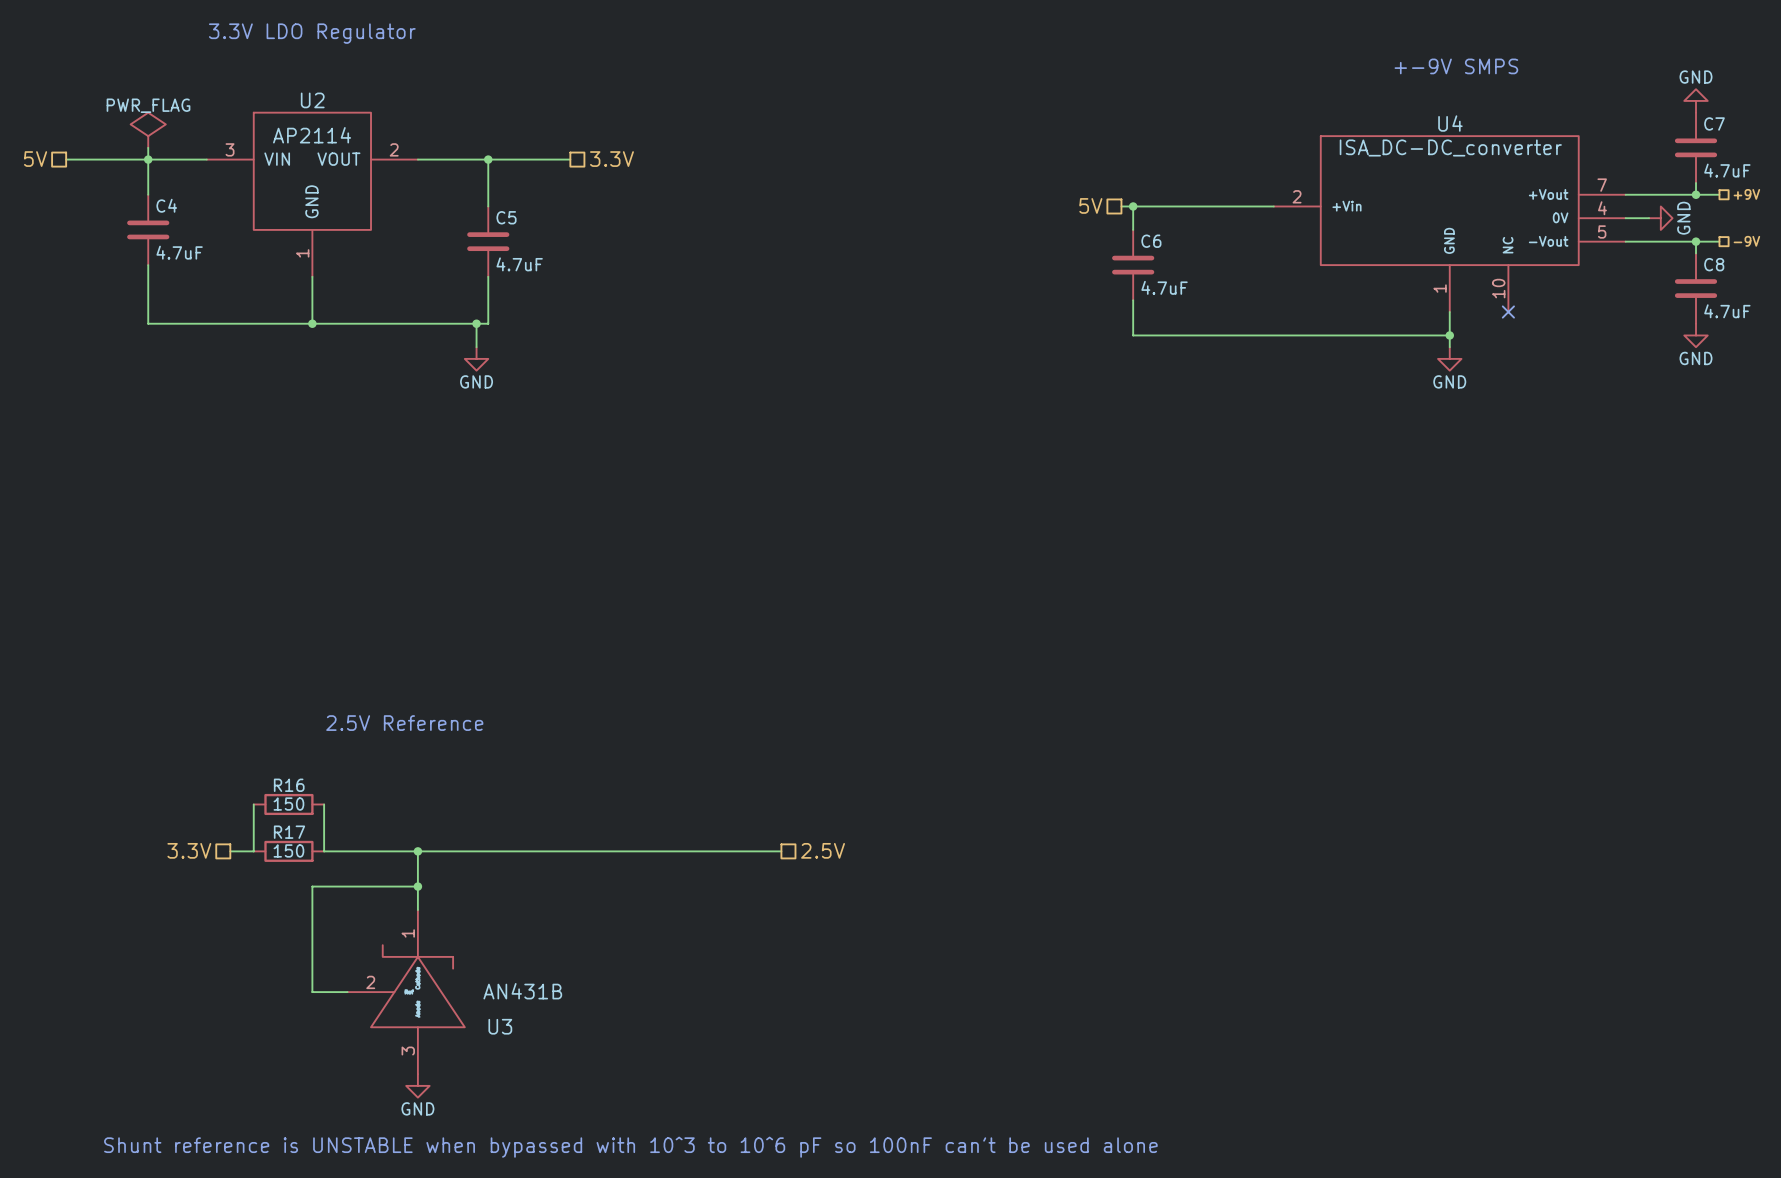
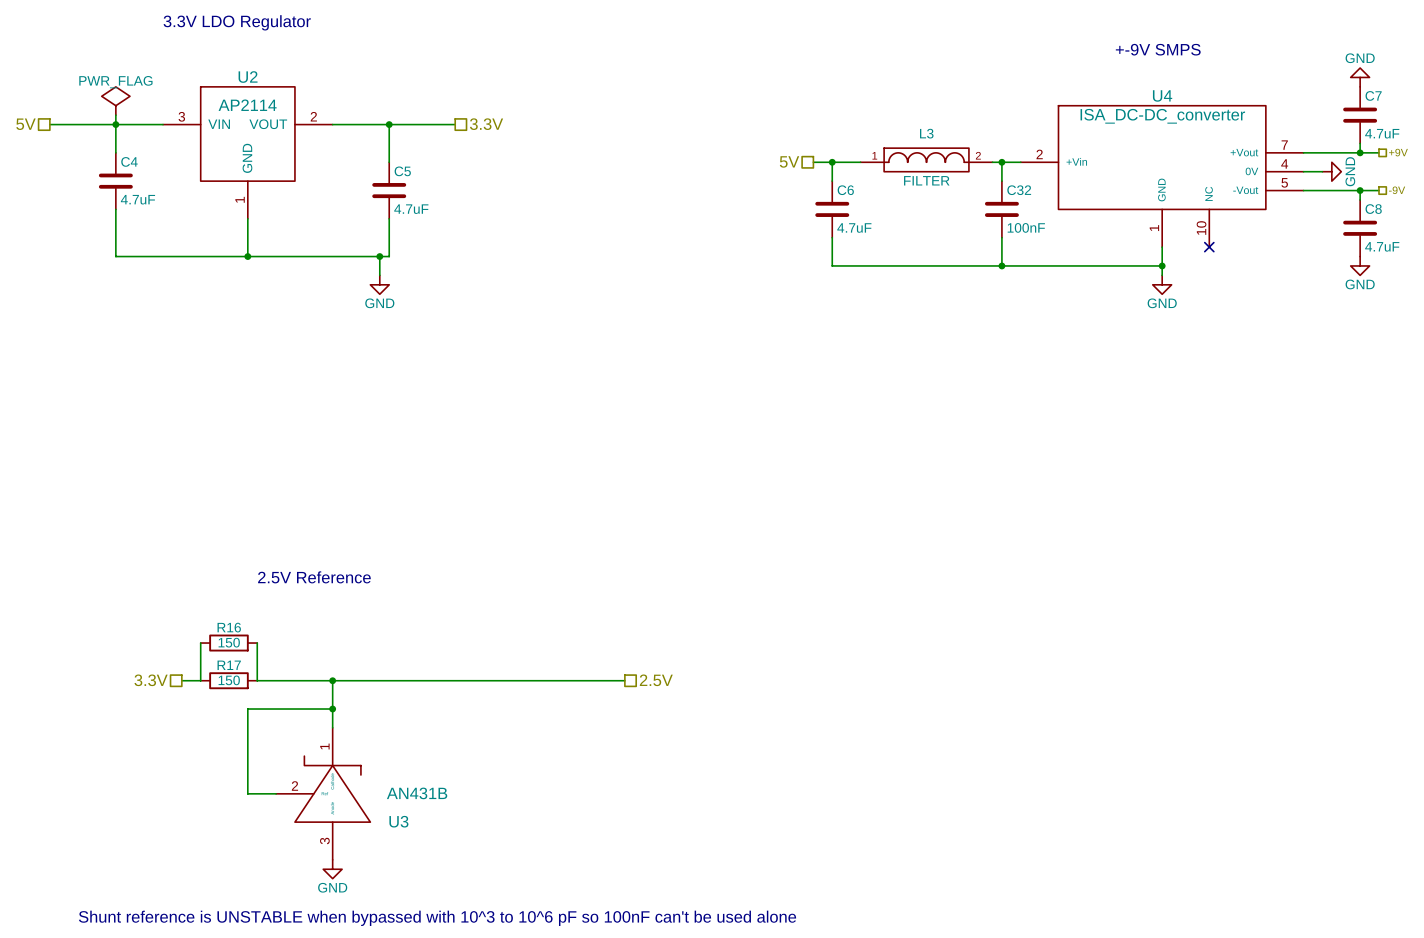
L3: none -> FILTER (926, 159)
hierarchical label position: 5V (1090, 205) -> 5V (789, 161)
wire: none -> (813, 162) (860, 162)
wire: none -> (832, 162) (832, 181)
junction: none -> (832, 162)
wire: (1121, 206) (1238, 206) -> none
wire: (1133, 206) (1133, 229) -> (1001, 162) (1001, 181)
junction: (1133, 206) -> none
junction: none -> (1001, 162)
C6 position: (1133, 265) -> (832, 209)
C32: none -> 100nF (1001, 209)
wire: (1133, 300) (1133, 335) -> (832, 237) (832, 265) (907, 265)
wire: none -> (1001, 237) (1001, 265)
junction: none -> (1001, 265)

